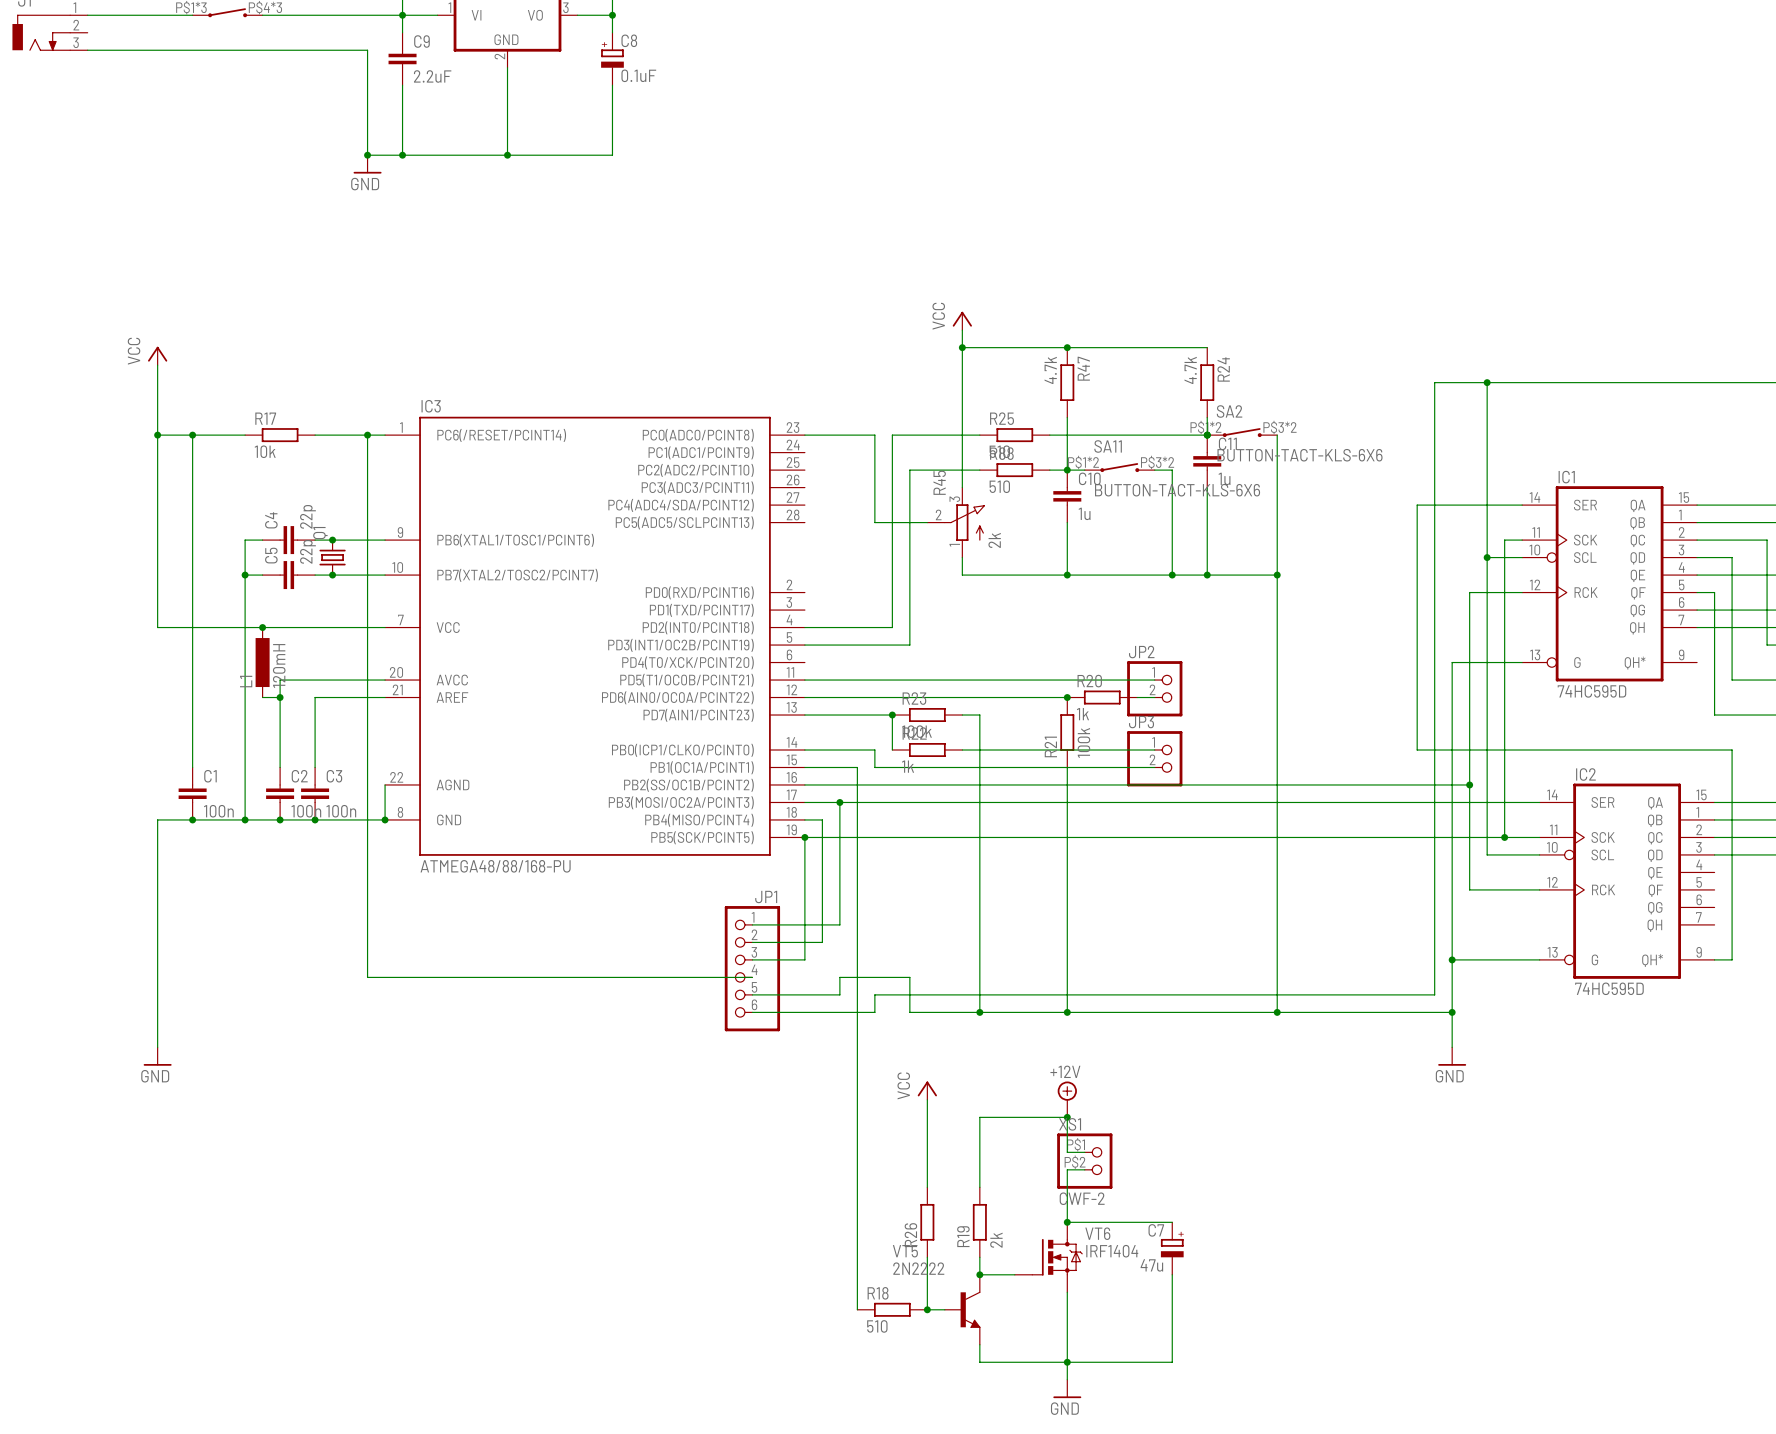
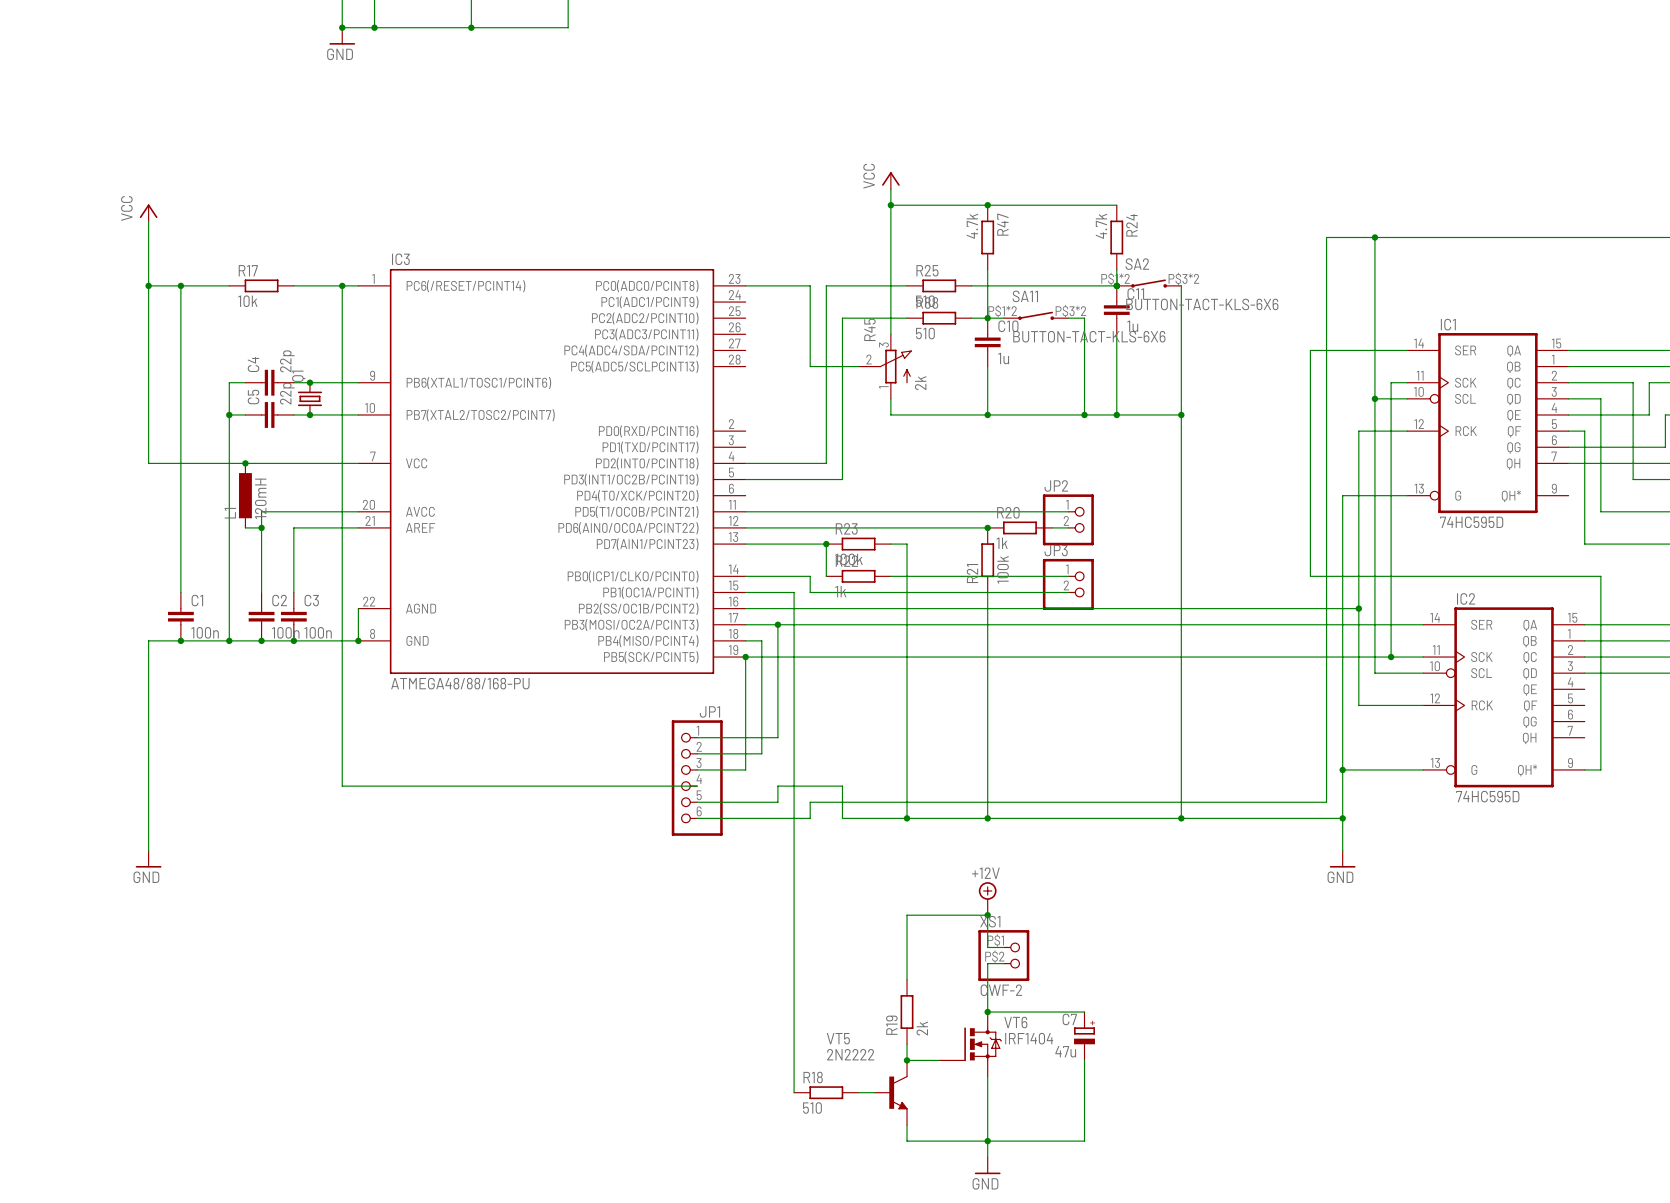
power symbol: VCC (927, 1090) -> none
wire: (927, 1099) (927, 1187) -> none
R26: (927, 1222) -> none
wire: (927, 1257) (927, 1309) -> none
junction: (927, 1309) -> none

